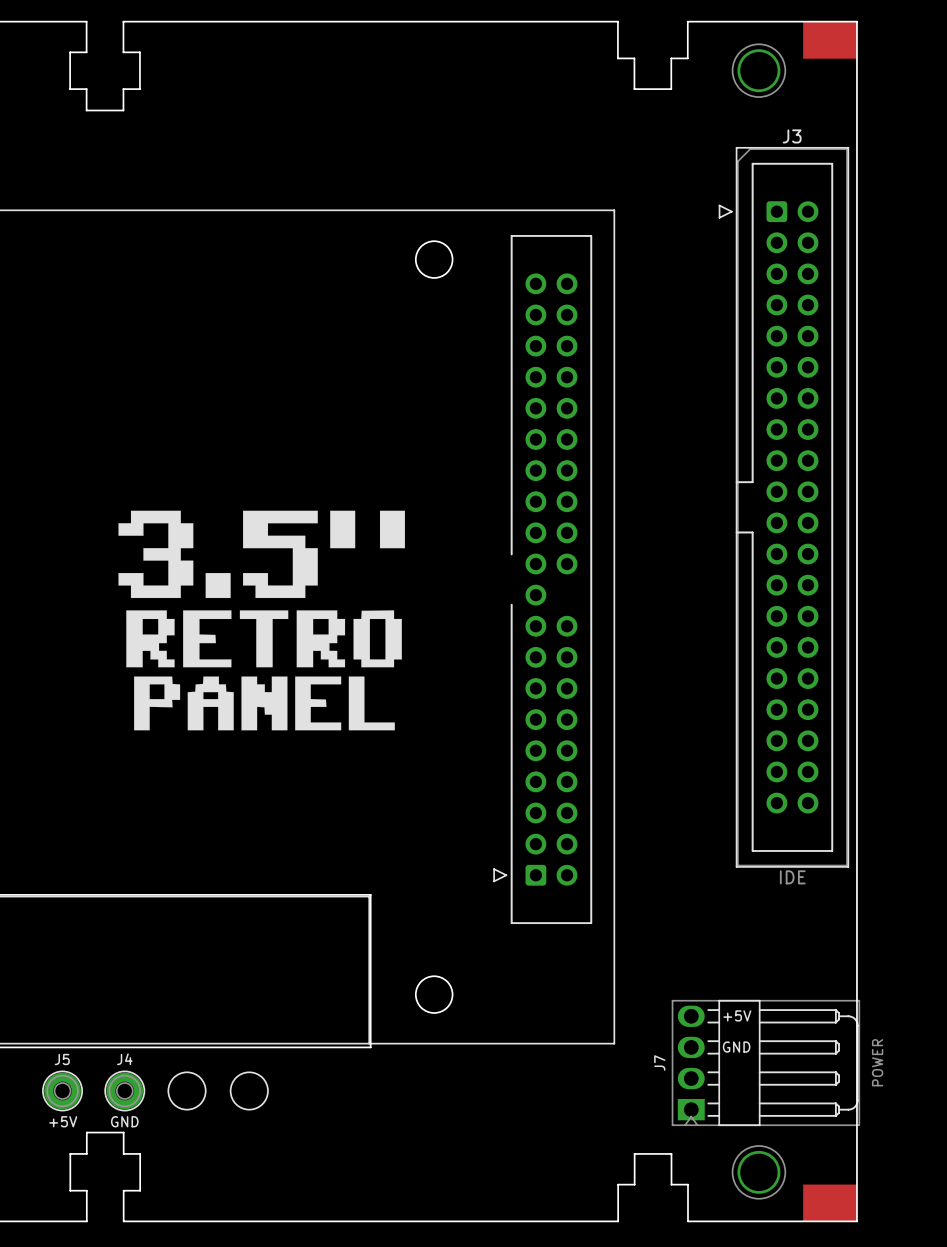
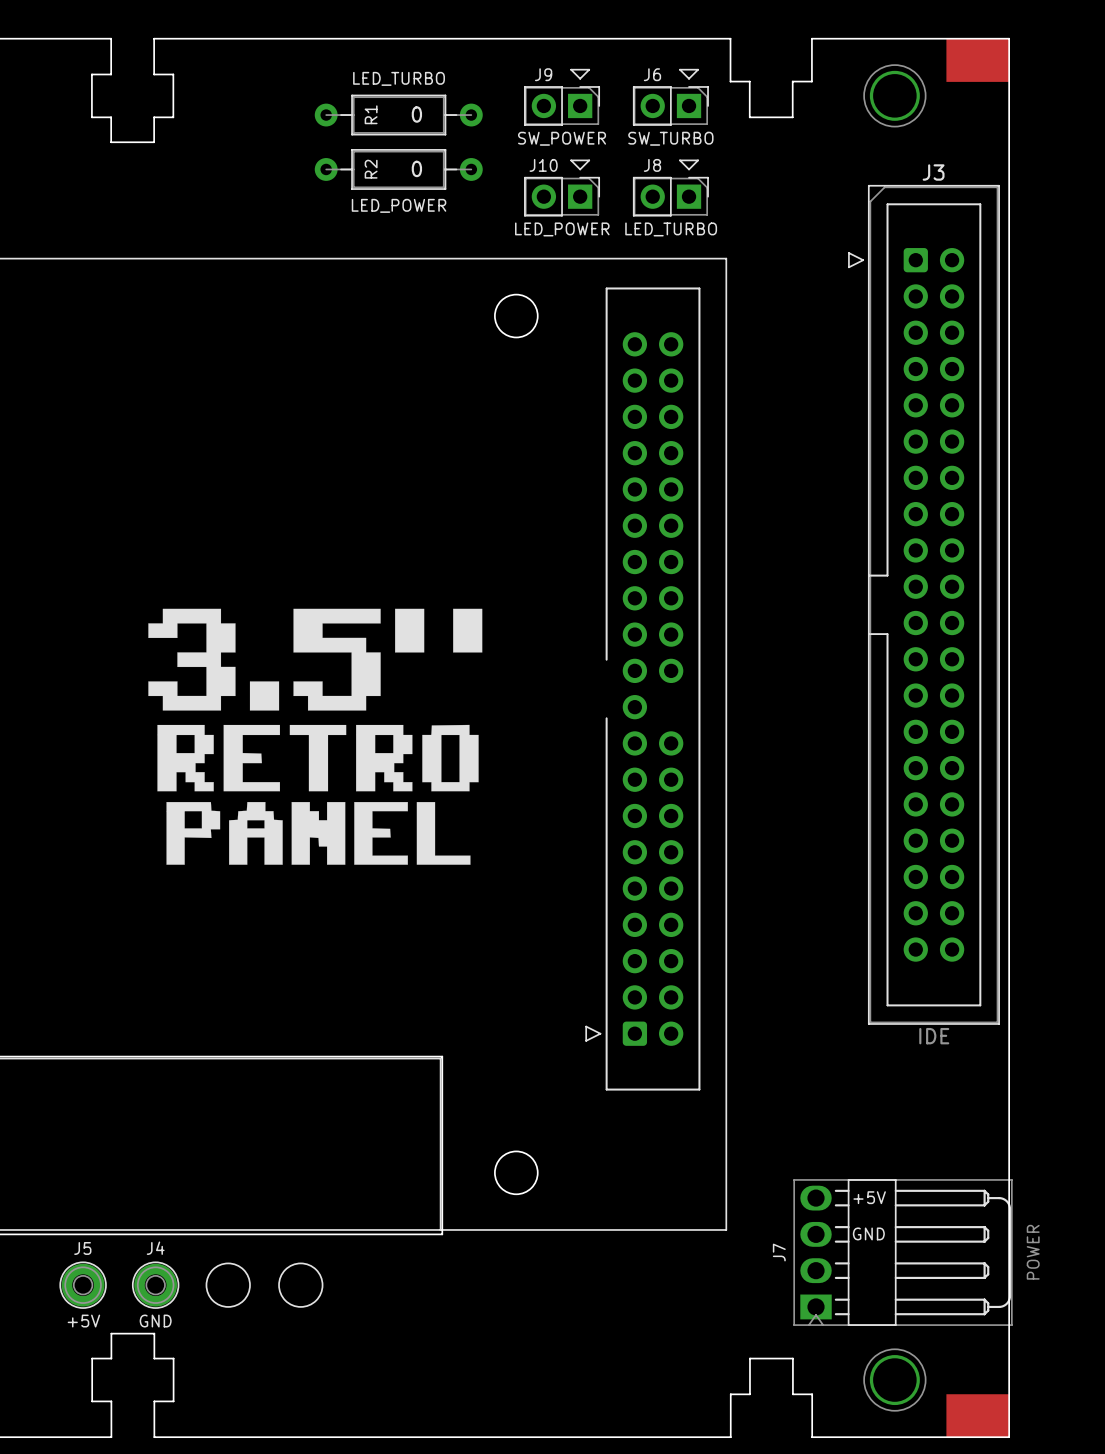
text: none -> LED_TURBO (399, 78)
J9: none -> SW_POWER (562, 97)
J6: none -> SW_TURBO (670, 97)
R1: none -> 0 (398, 115)
R2: none -> 0 (398, 169)
J10: none -> LED_POWER (562, 188)
J8: none -> LED_TURBO (670, 188)
text: none -> LED_POWER (399, 205)

